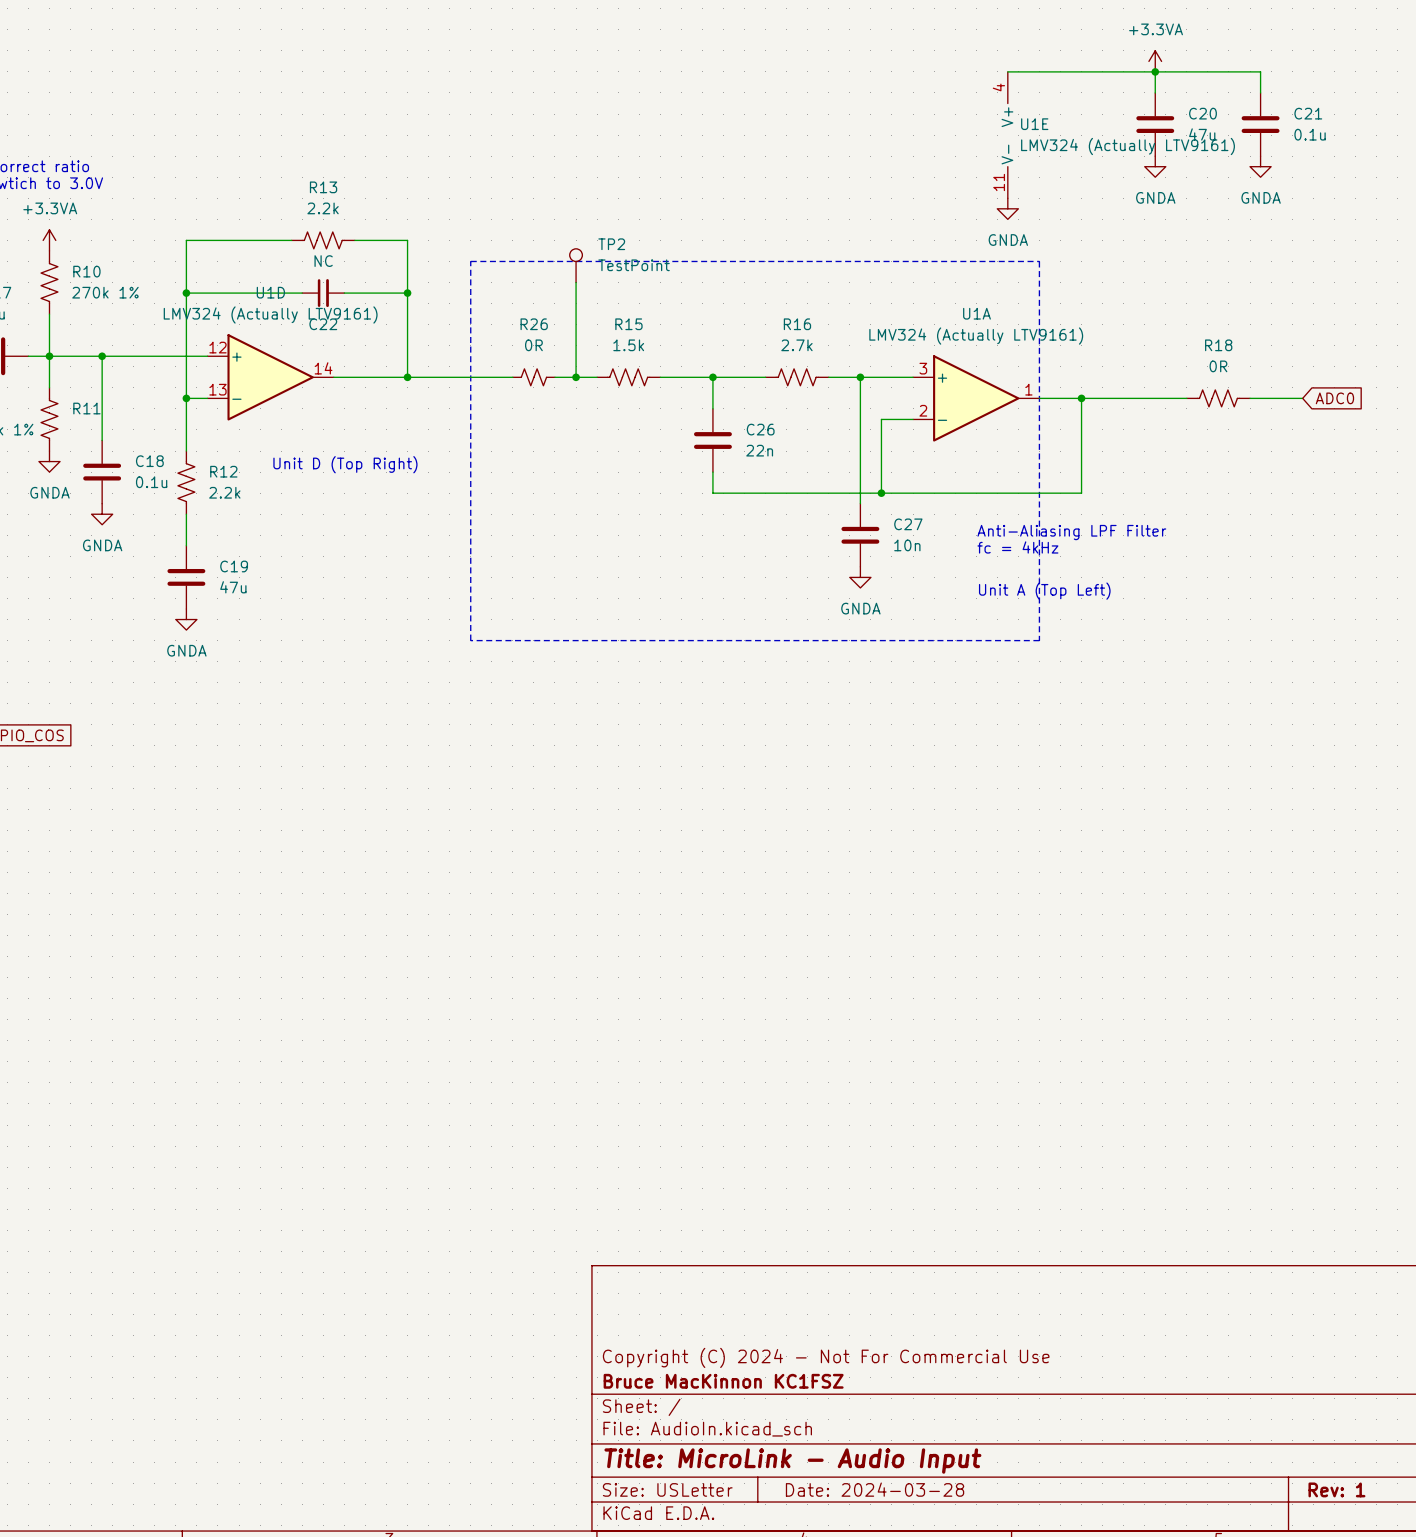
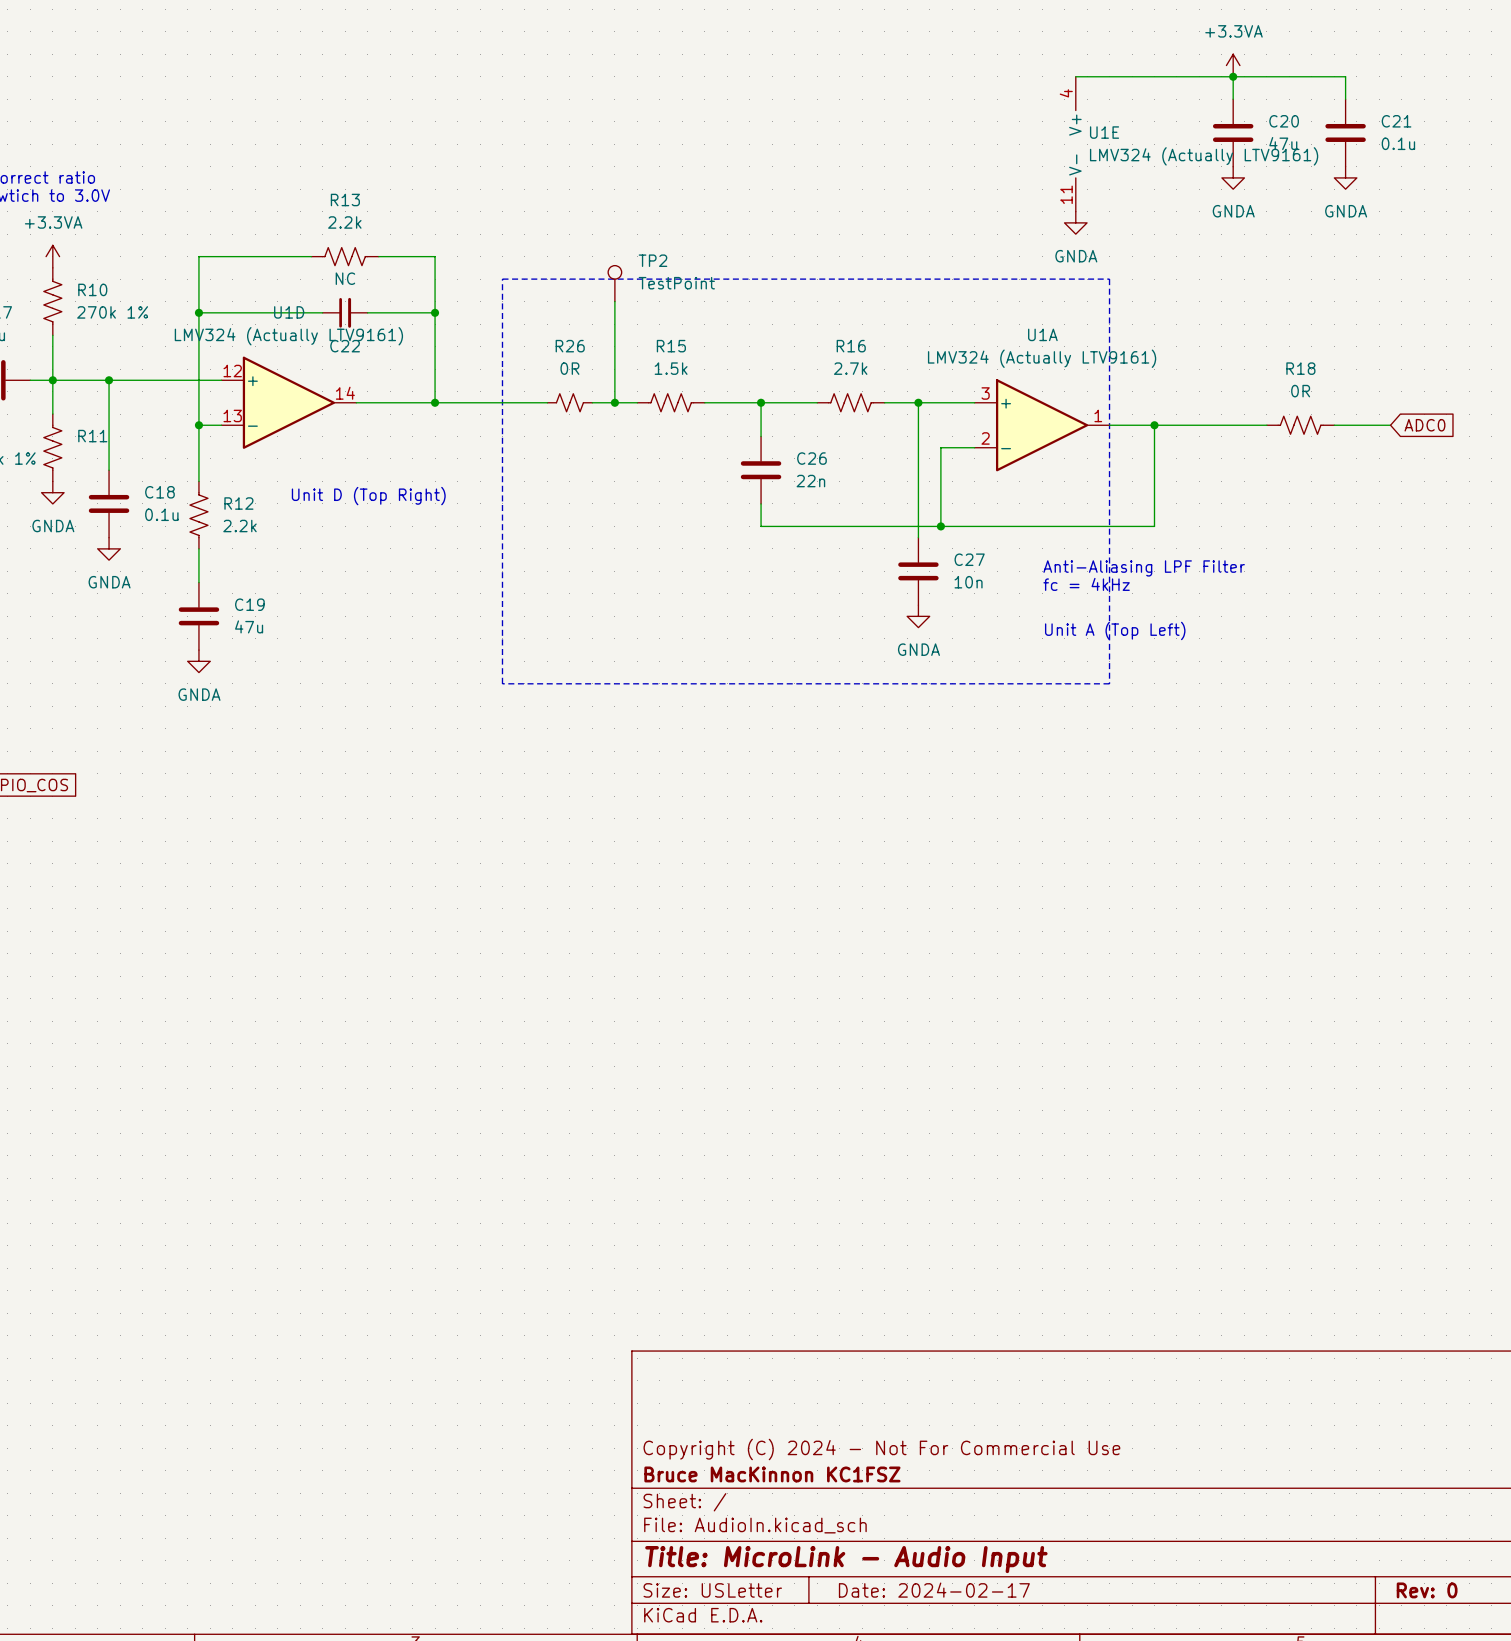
title block: Date: 2024-03-28 (875, 1489) -> Date: 2024-02-17 (934, 1590)
title block: Rev: 1 (1336, 1489) -> Rev: 0 (1427, 1590)

